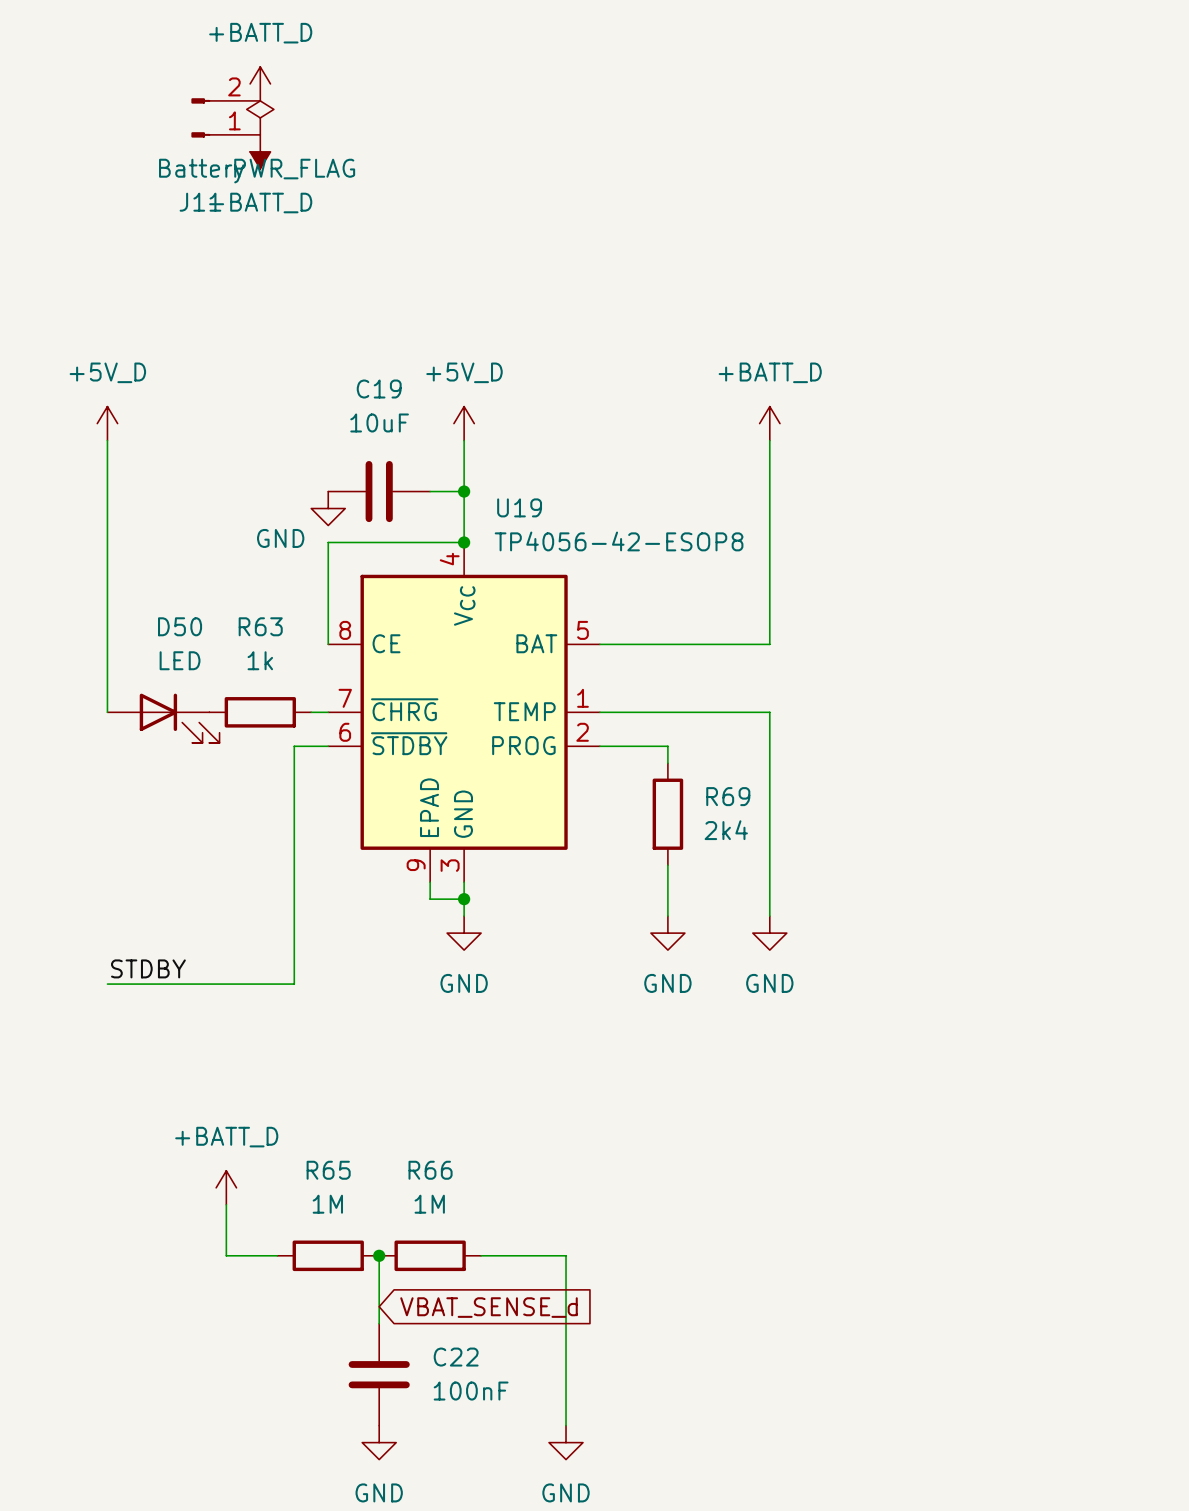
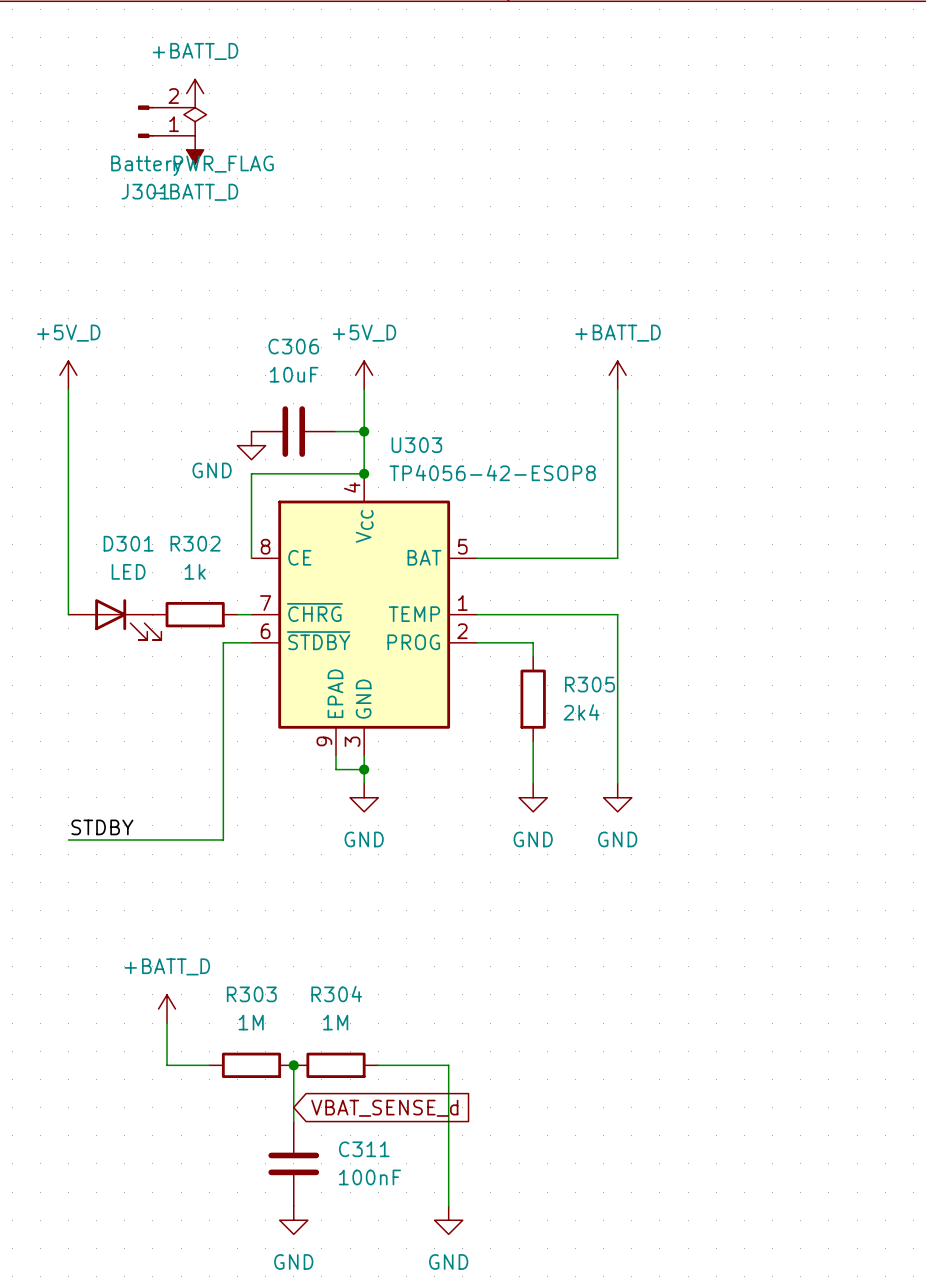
J11 name: J11 (200, 202) -> J301 (145, 191)
C19 name: C19 (379, 389) -> C306 (293, 346)
U19 name: U19 (519, 507) -> U303 (416, 445)
D50 name: D50 (180, 626) -> D301 (128, 543)
R63 name: R63 (260, 626) -> R302 (195, 543)
R69 name: R69 (728, 796) -> R305 (589, 684)
R65 name: R65 (328, 1170) -> R303 (251, 994)
R66 name: R66 (430, 1170) -> R304 (336, 994)
C22 name: C22 (456, 1357) -> C311 (364, 1149)

